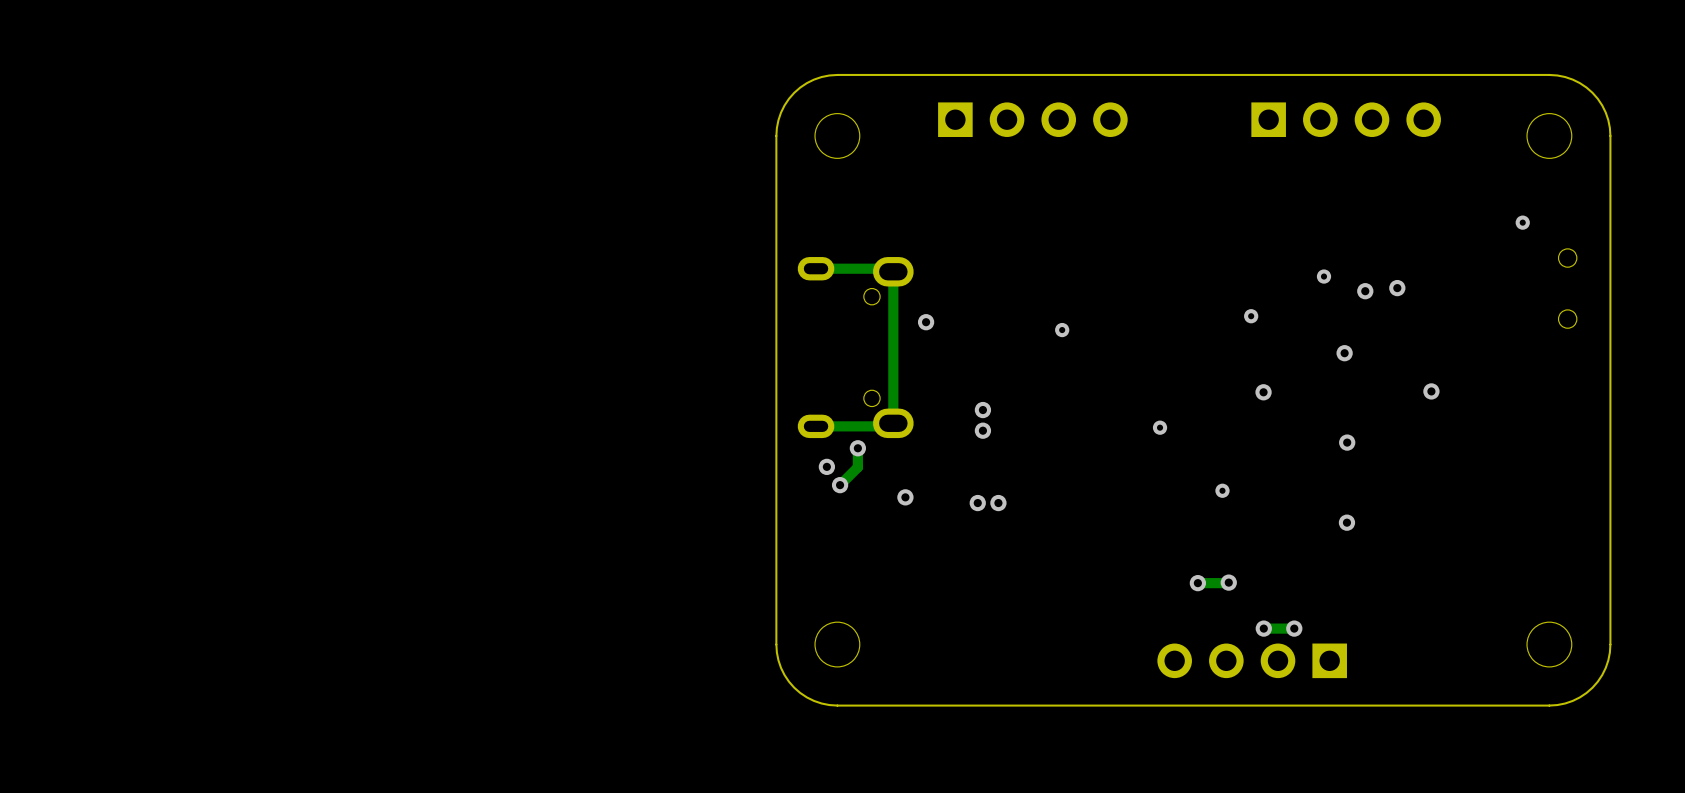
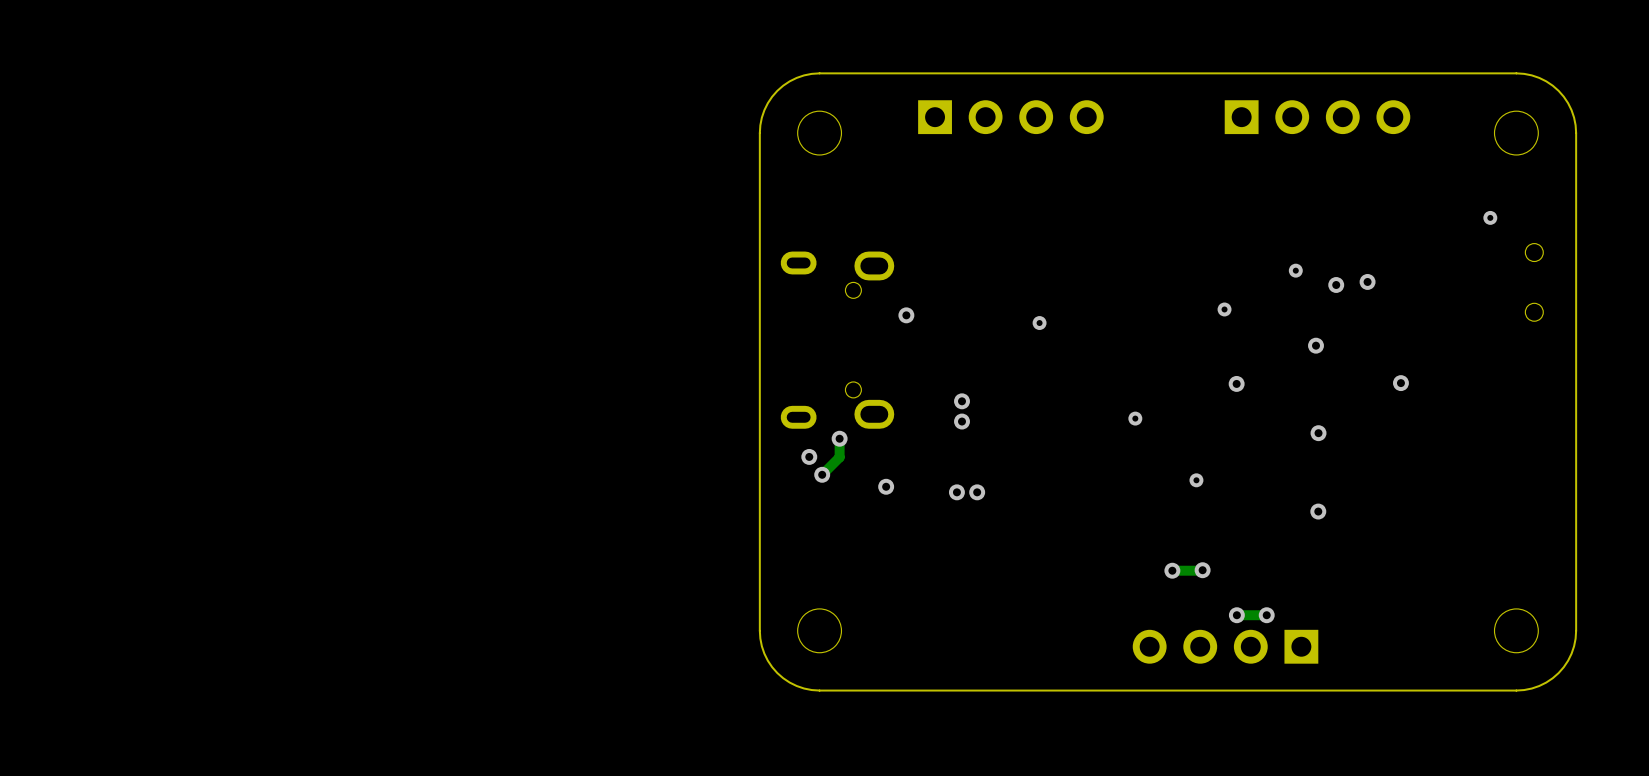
track: (816, 268) (890, 268) (893, 271) (893, 423) (890, 426) (816, 426) -> none

